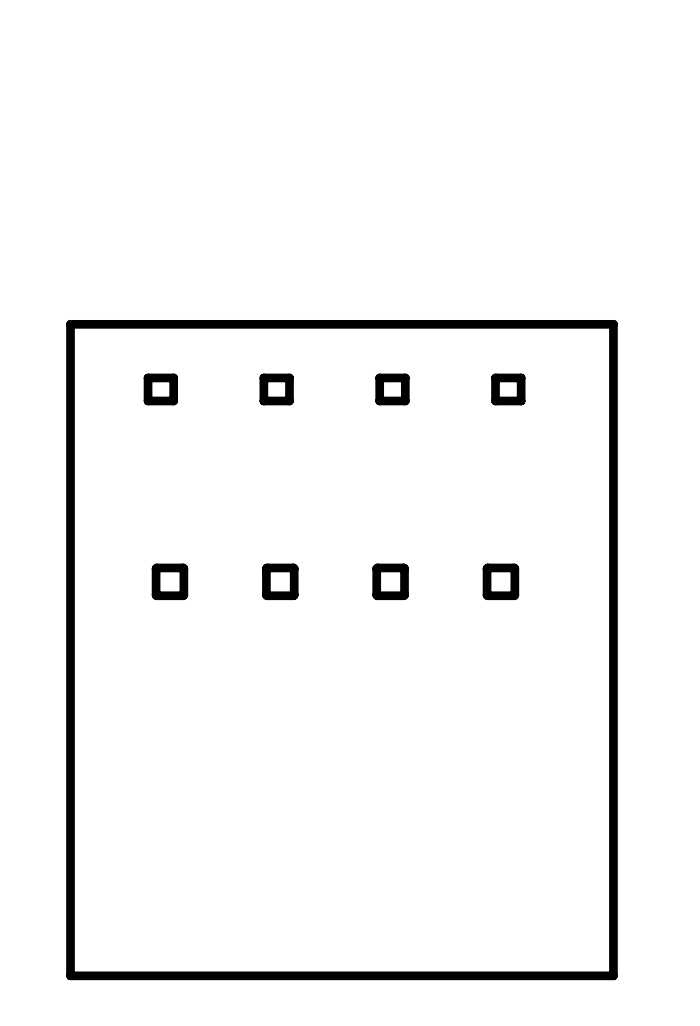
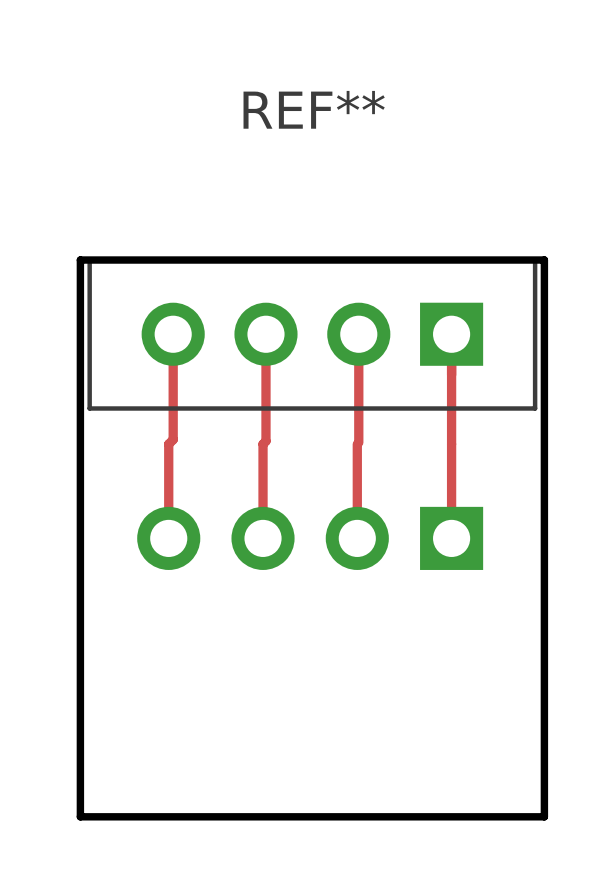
board edge: (148, 377) (173, 377) (173, 400) (148, 400) (148, 377) -> none
board edge: (263, 377) (289, 377) (289, 400) (263, 400) (263, 377) -> none
board edge: (379, 377) (405, 377) (405, 400) (379, 400) (379, 377) -> none
board edge: (495, 377) (521, 377) (521, 400) (495, 400) (495, 377) -> none
top track: none -> (173, 334) (173, 439) (168, 444) (168, 538) (173, 533)
top track: none -> (265, 334) (265, 441) (263, 444) (263, 538) (265, 535)
REF**: none -> (312, 334)
top track: none -> (358, 334) (358, 442)
top track: none -> (451, 334) (451, 538)
top track: none -> (357, 444) (357, 538) (358, 536)
board edge: (156, 567) (183, 568) (183, 595) (156, 595) (156, 567) -> none
board edge: (267, 567) (293, 568) (293, 595) (266, 595) (267, 567) -> none
board edge: (377, 567) (404, 568) (404, 595) (376, 595) (377, 567) -> none
board edge: (487, 567) (514, 568) (514, 595) (487, 595) (487, 567) -> none
part: none -> (310, 538)

